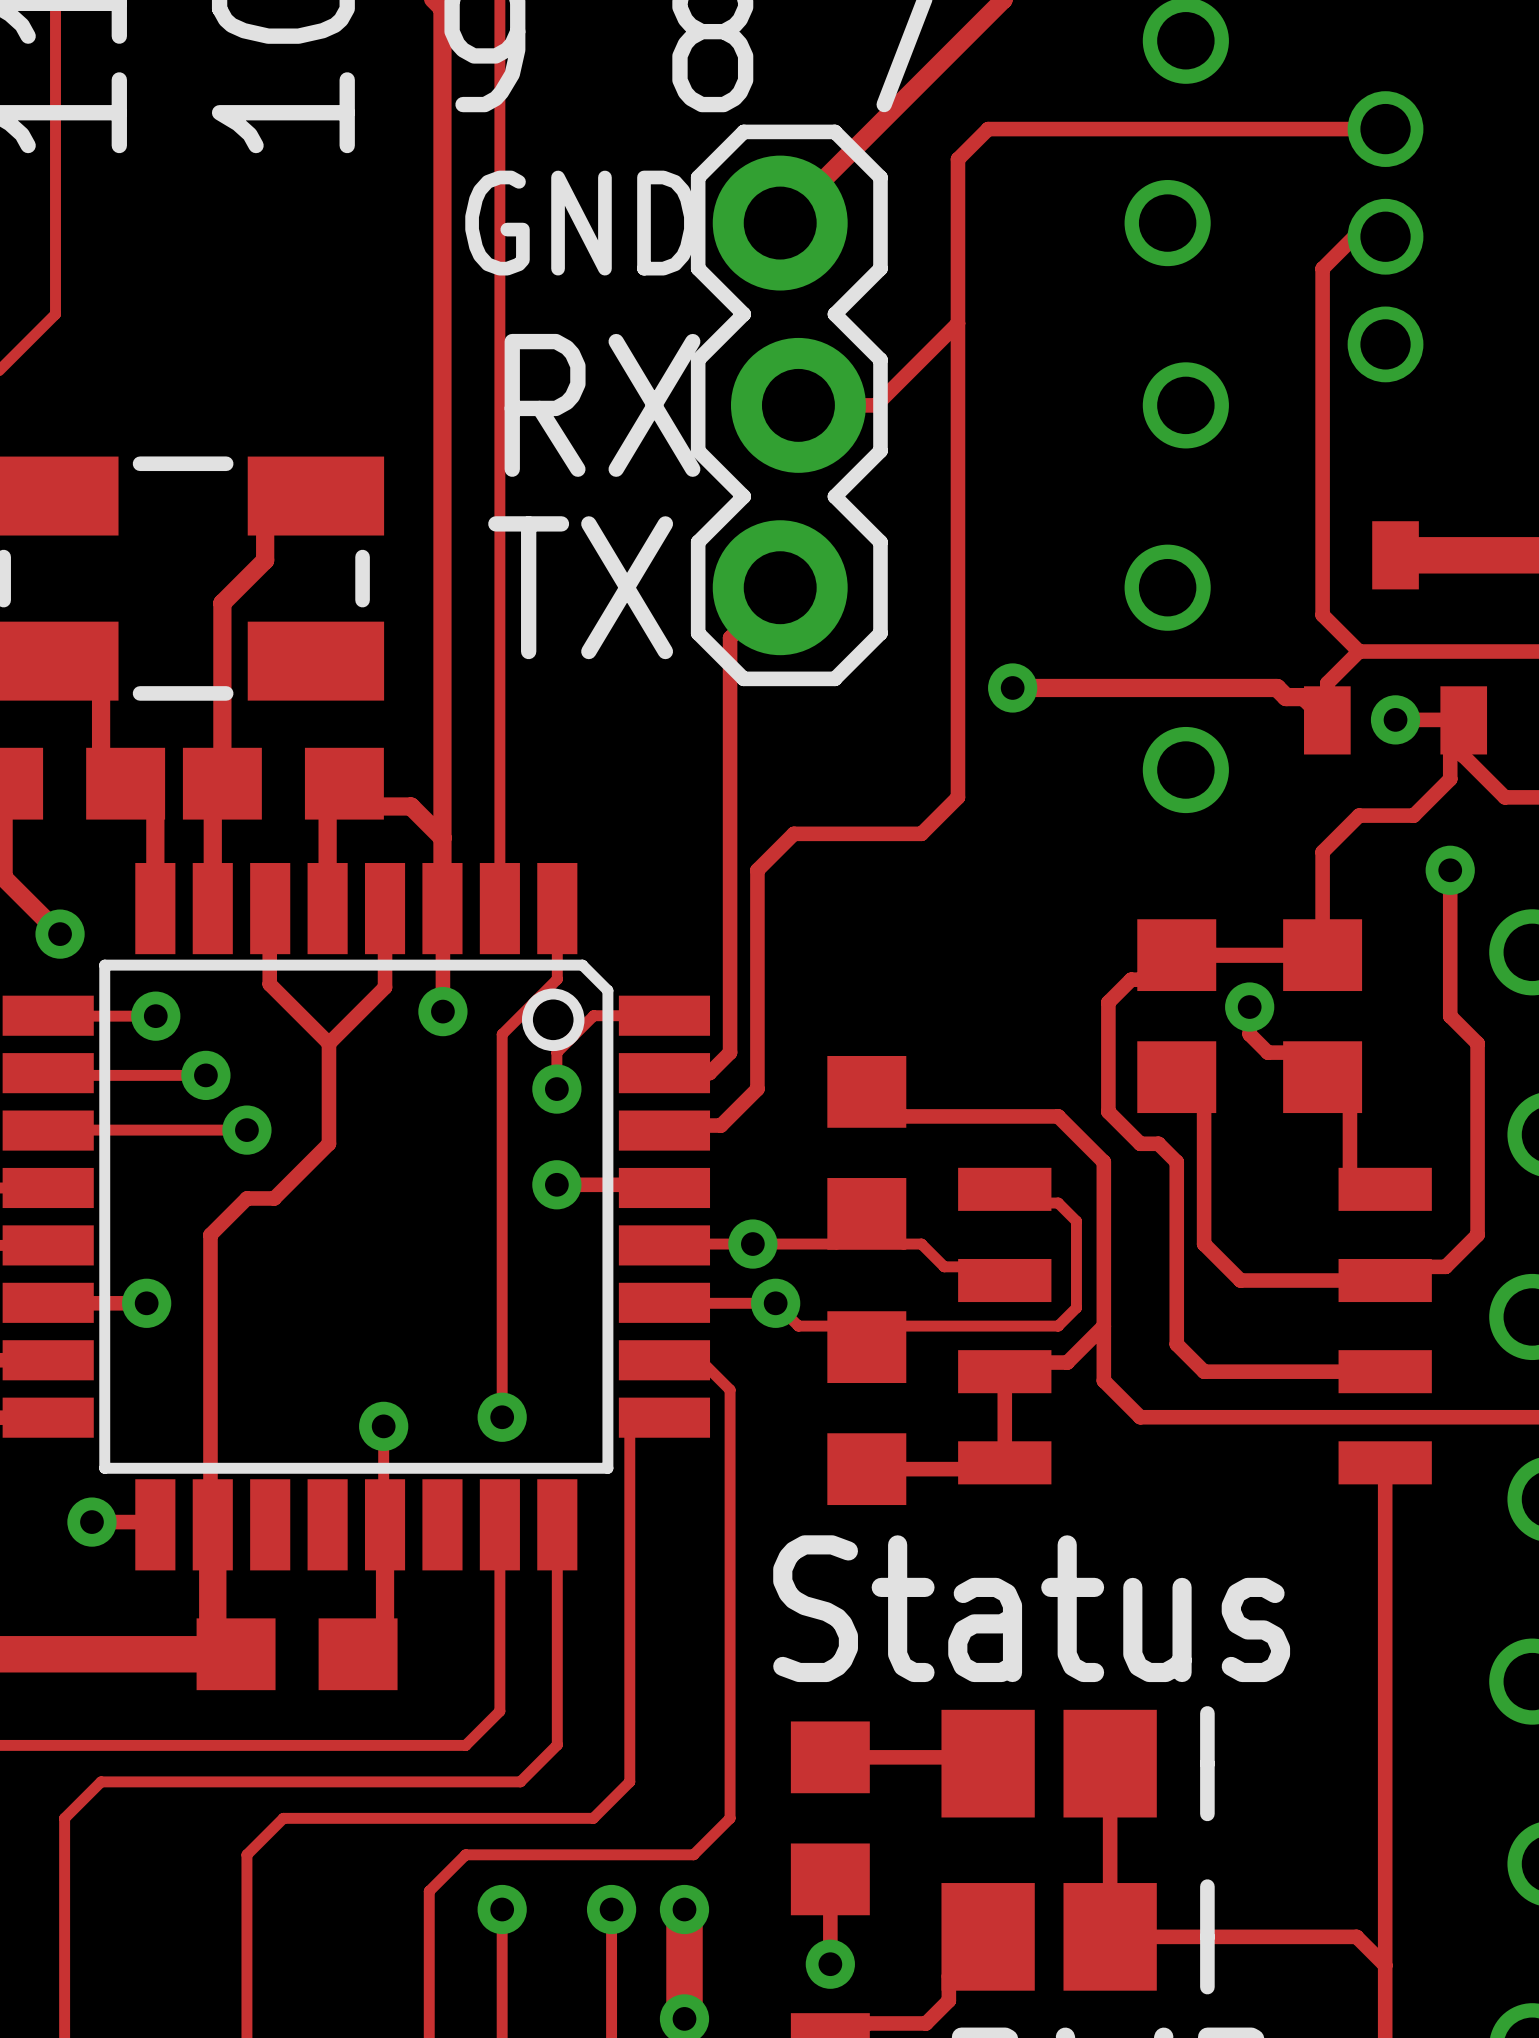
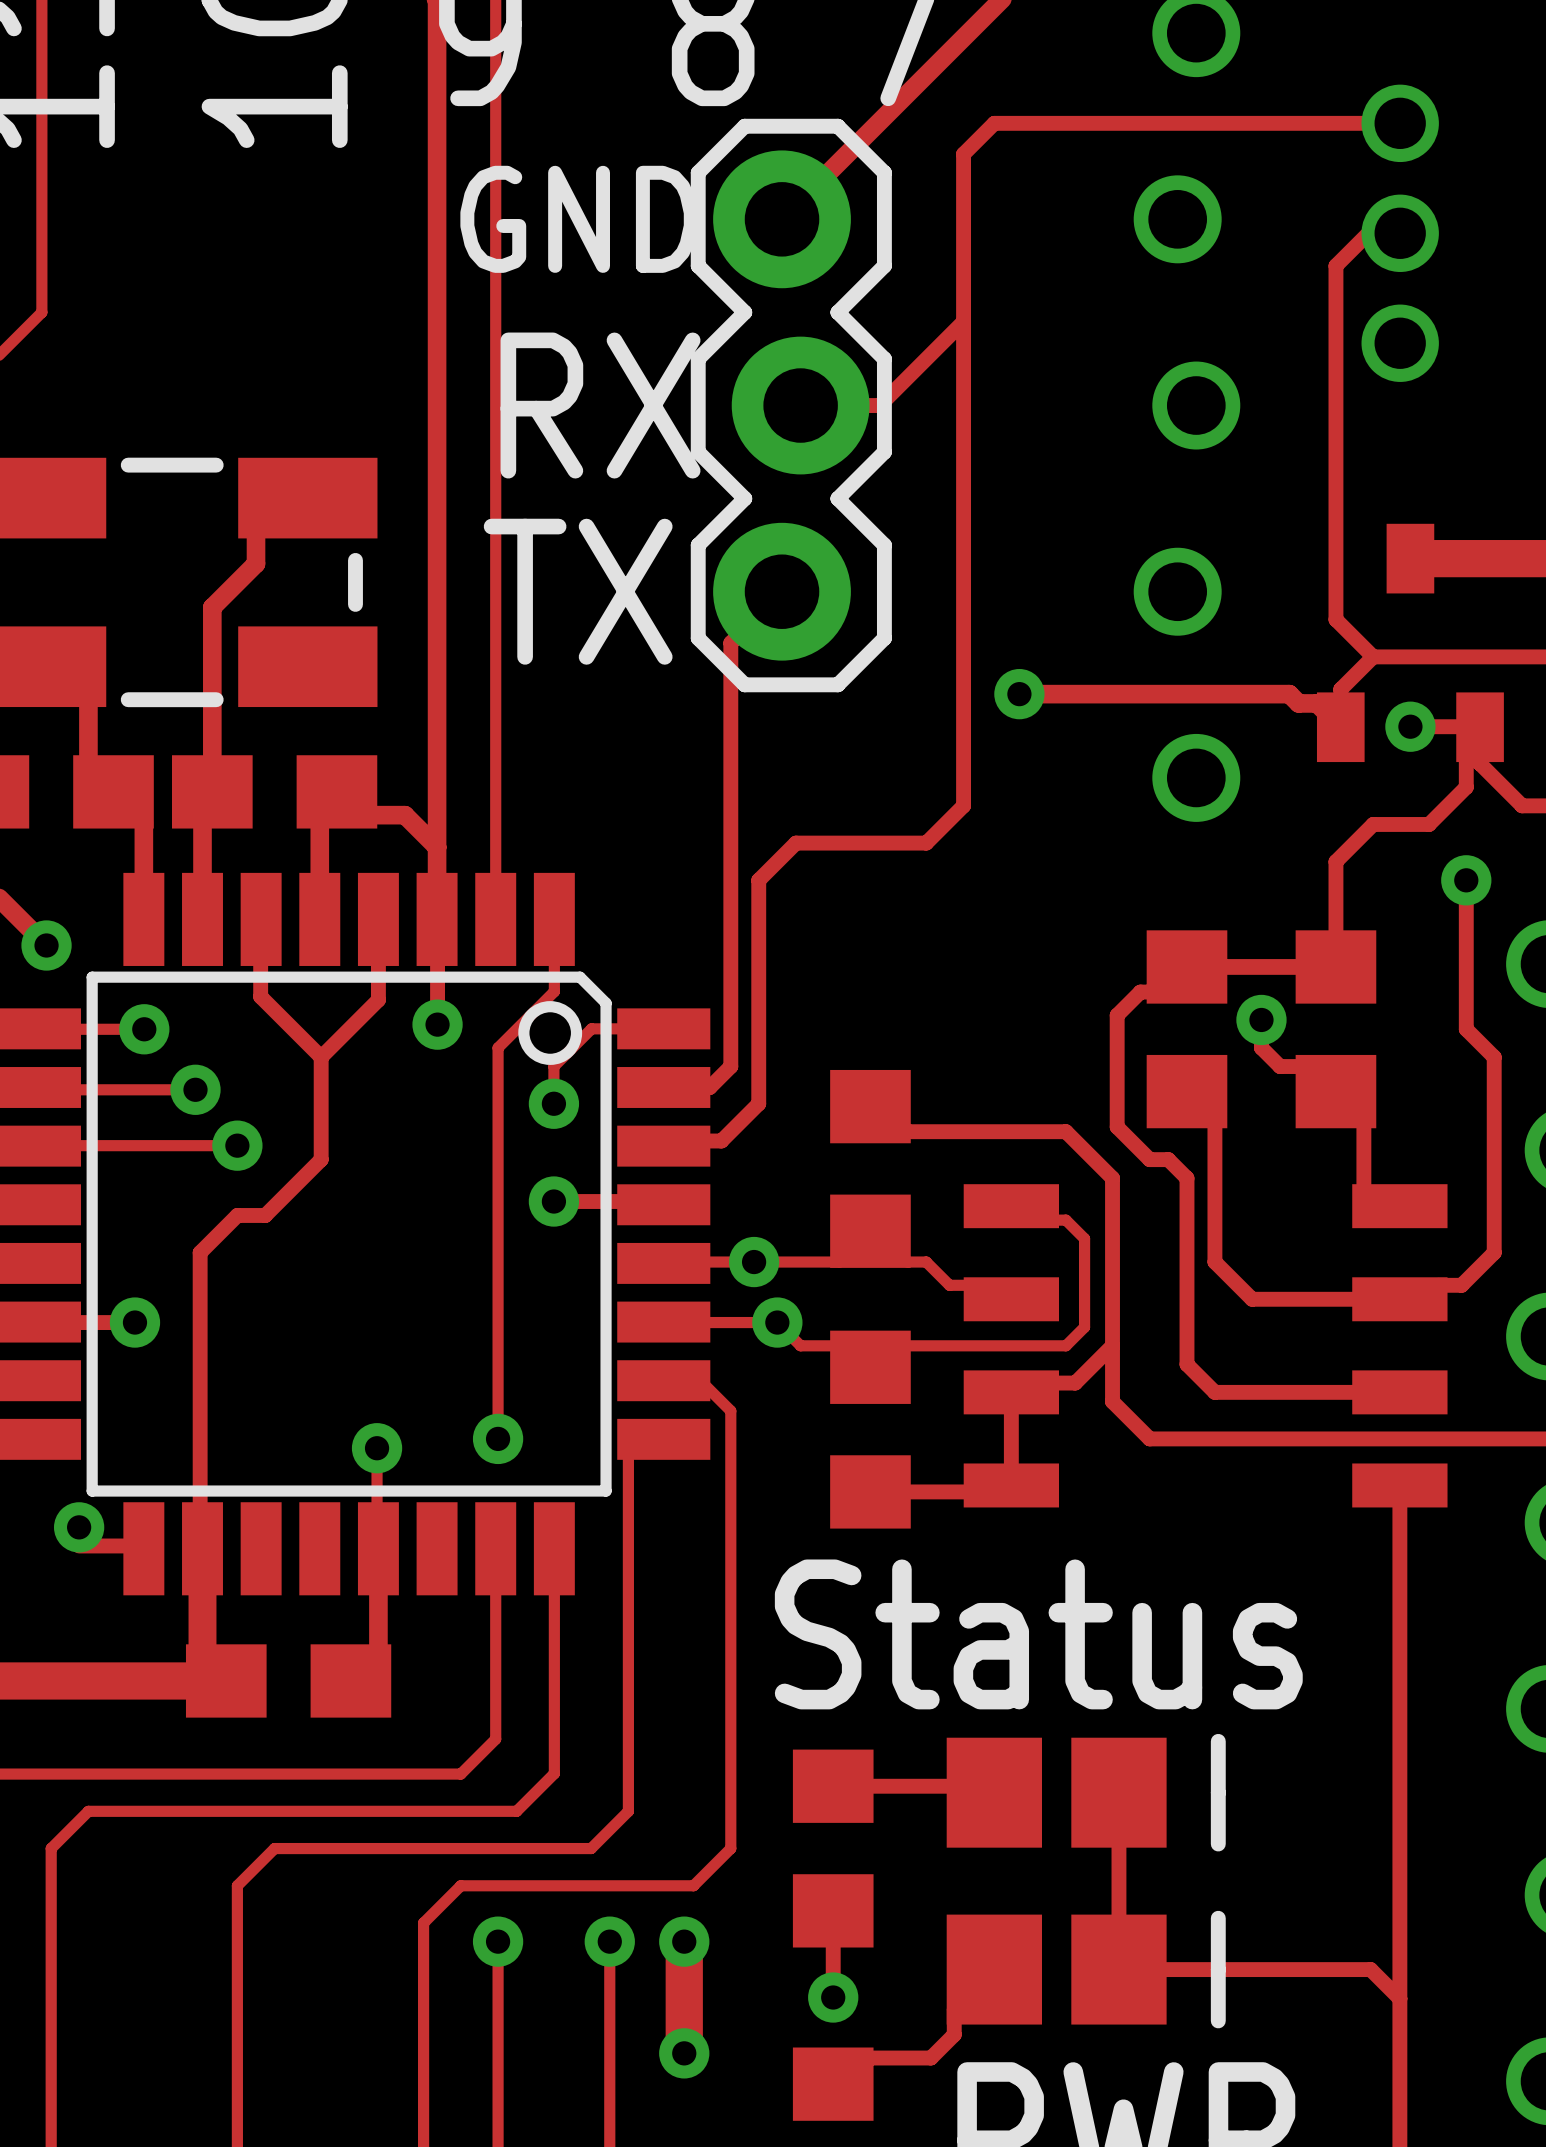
via position: (91, 1522) -> (79, 1527)

